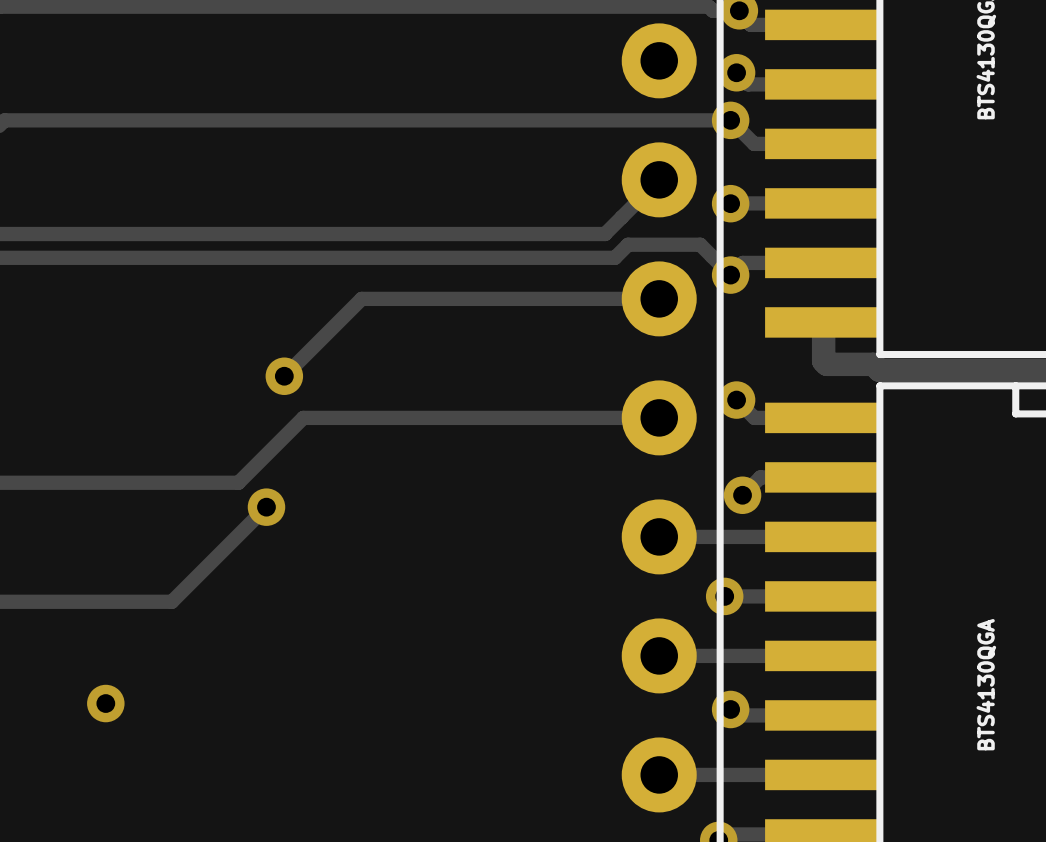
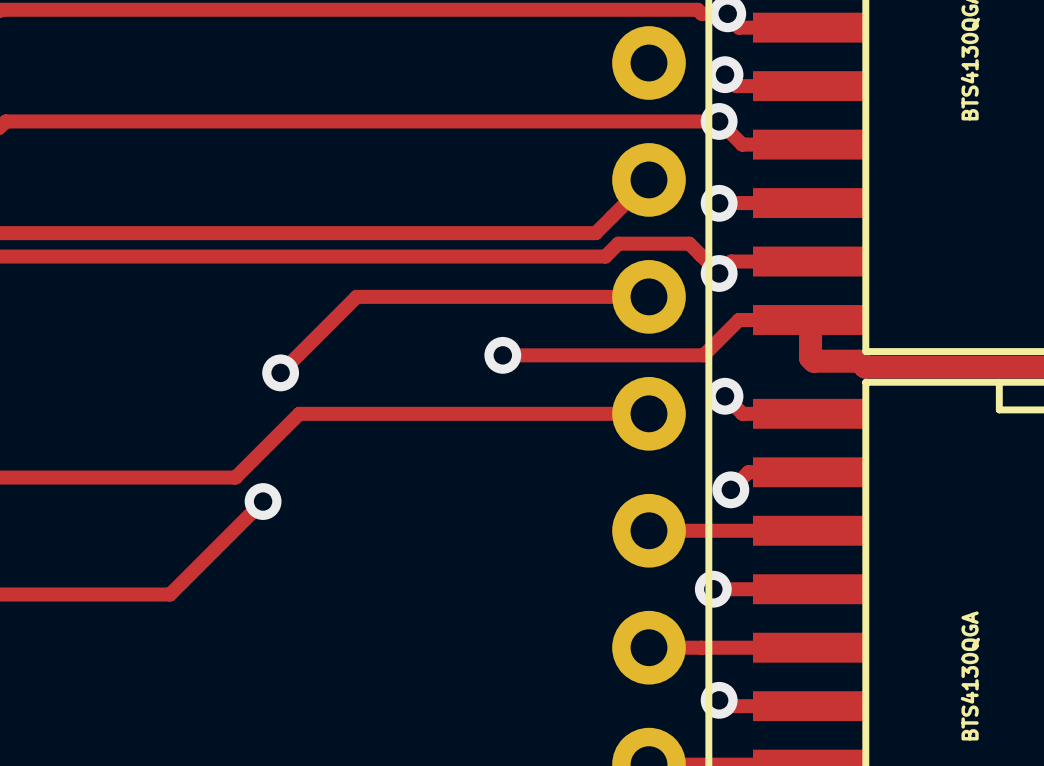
track: none -> (810, 320) (738, 320) (703, 355) (502, 355)
via: none -> (502, 355)
via: (105, 703) -> none

